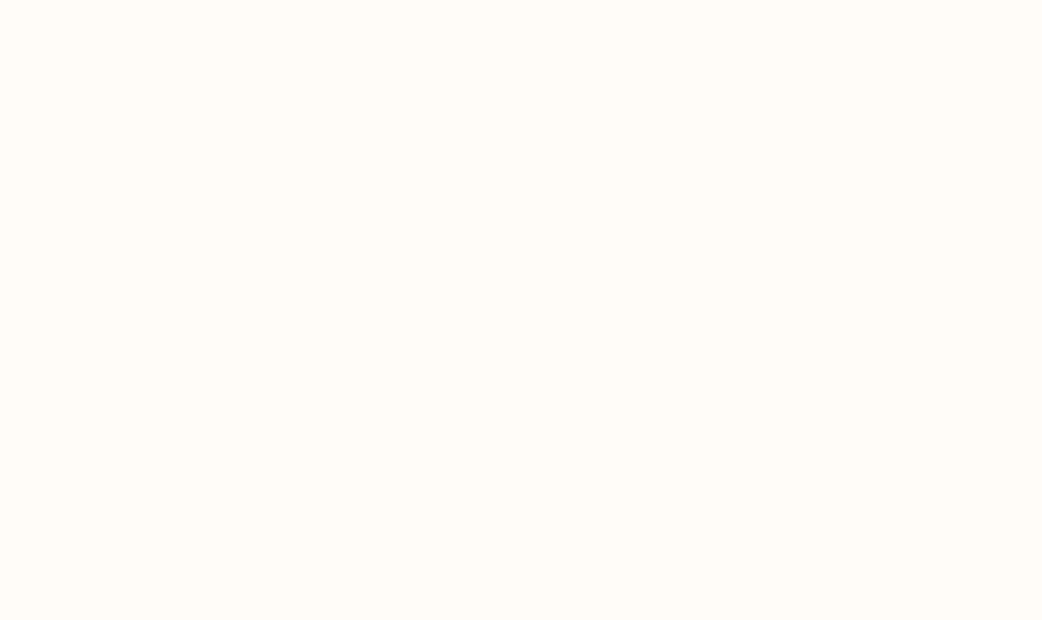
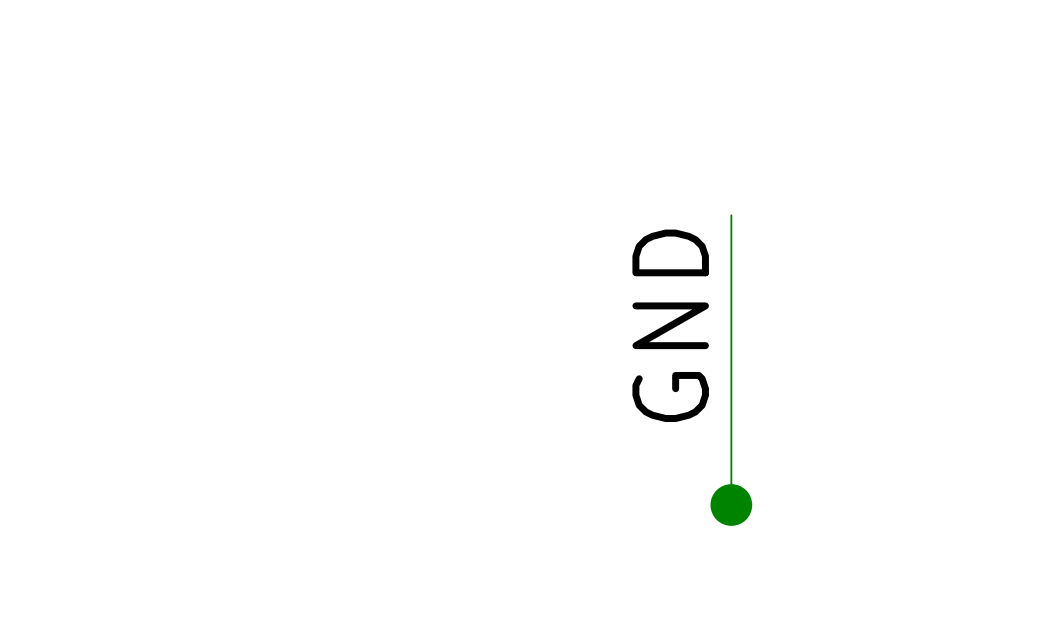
wire: none -> (731, 215) (731, 504)
label: none -> GND (670, 325)
junction: none -> (731, 504)

